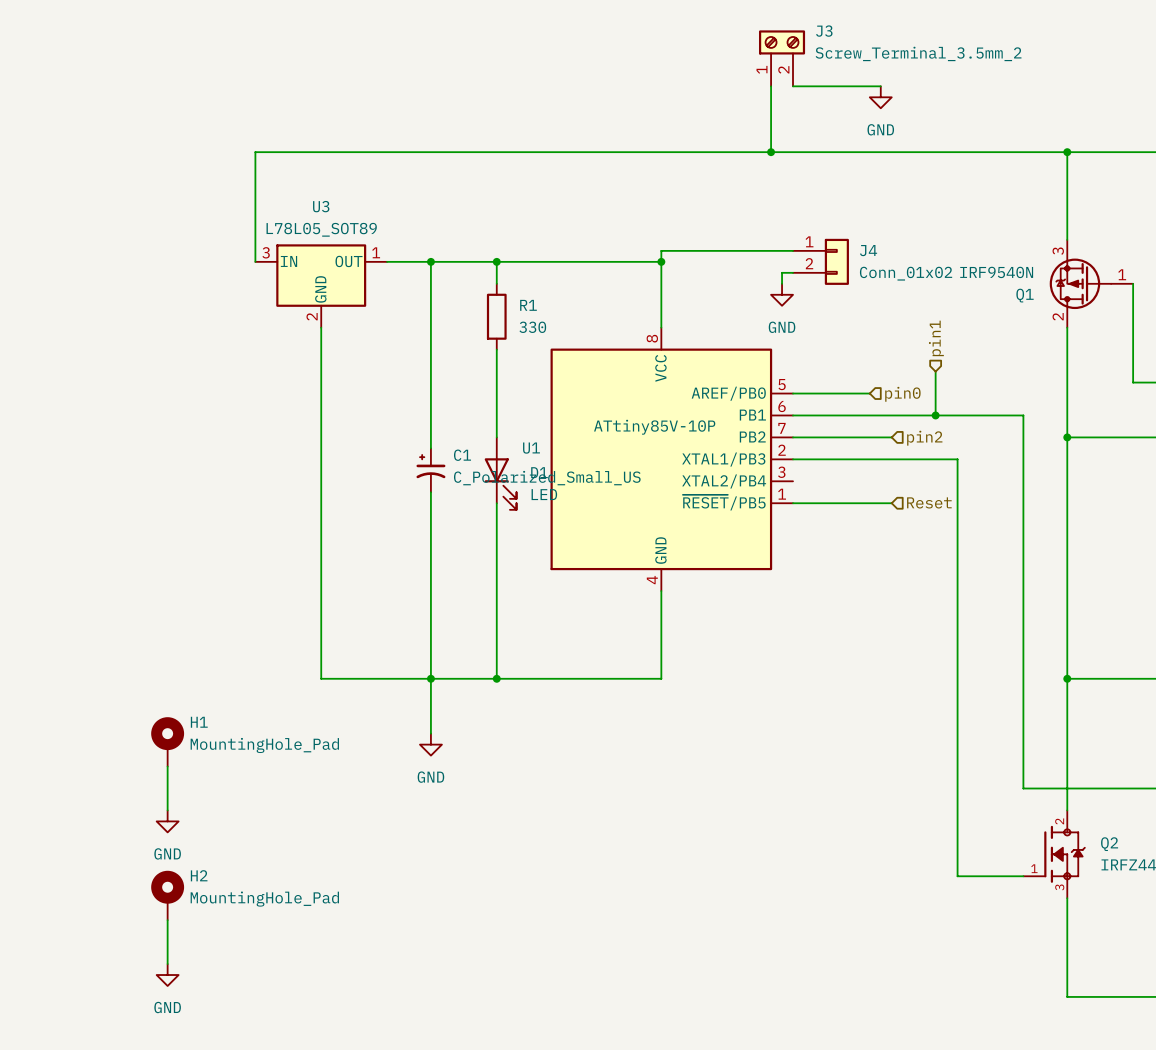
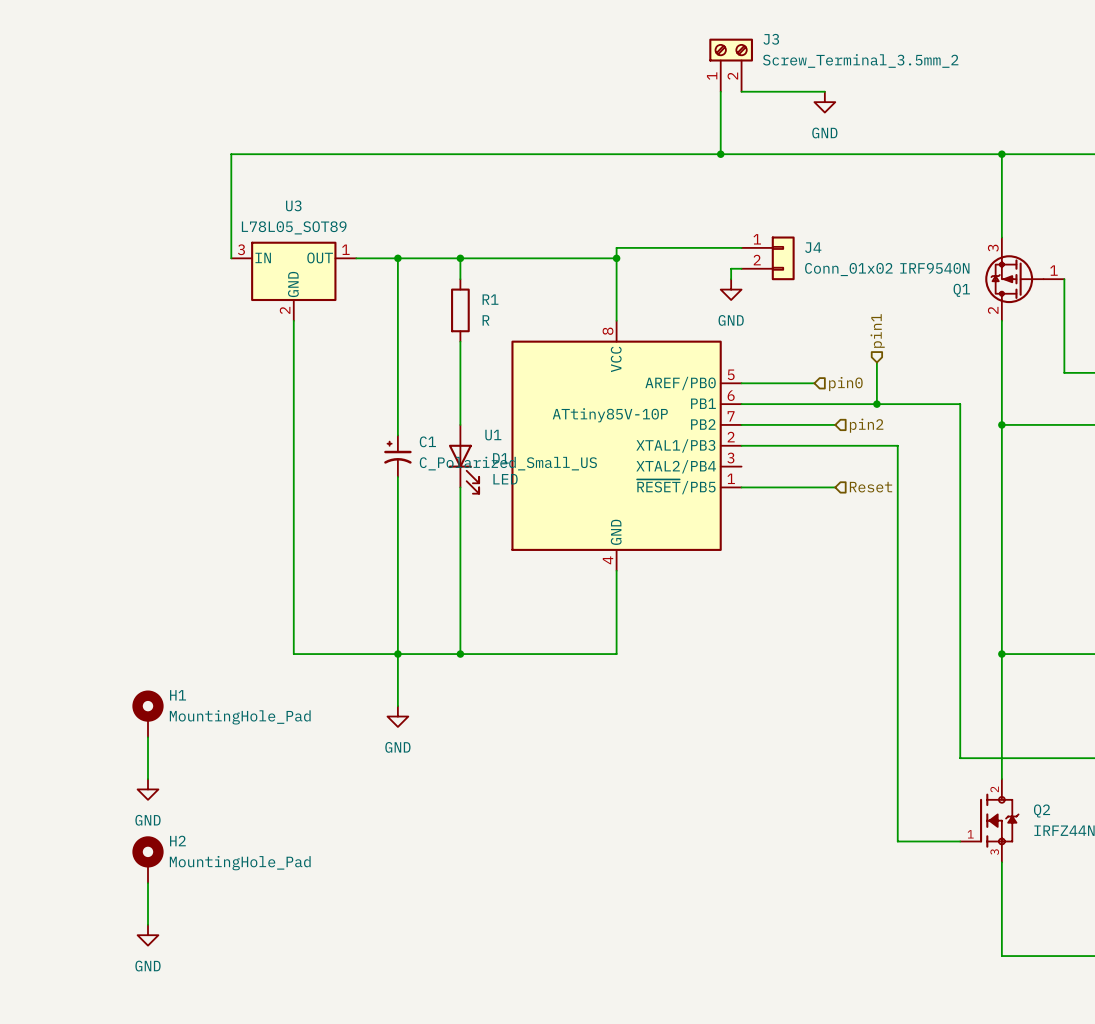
R1 value: 330 (532, 327) -> R (485, 320)

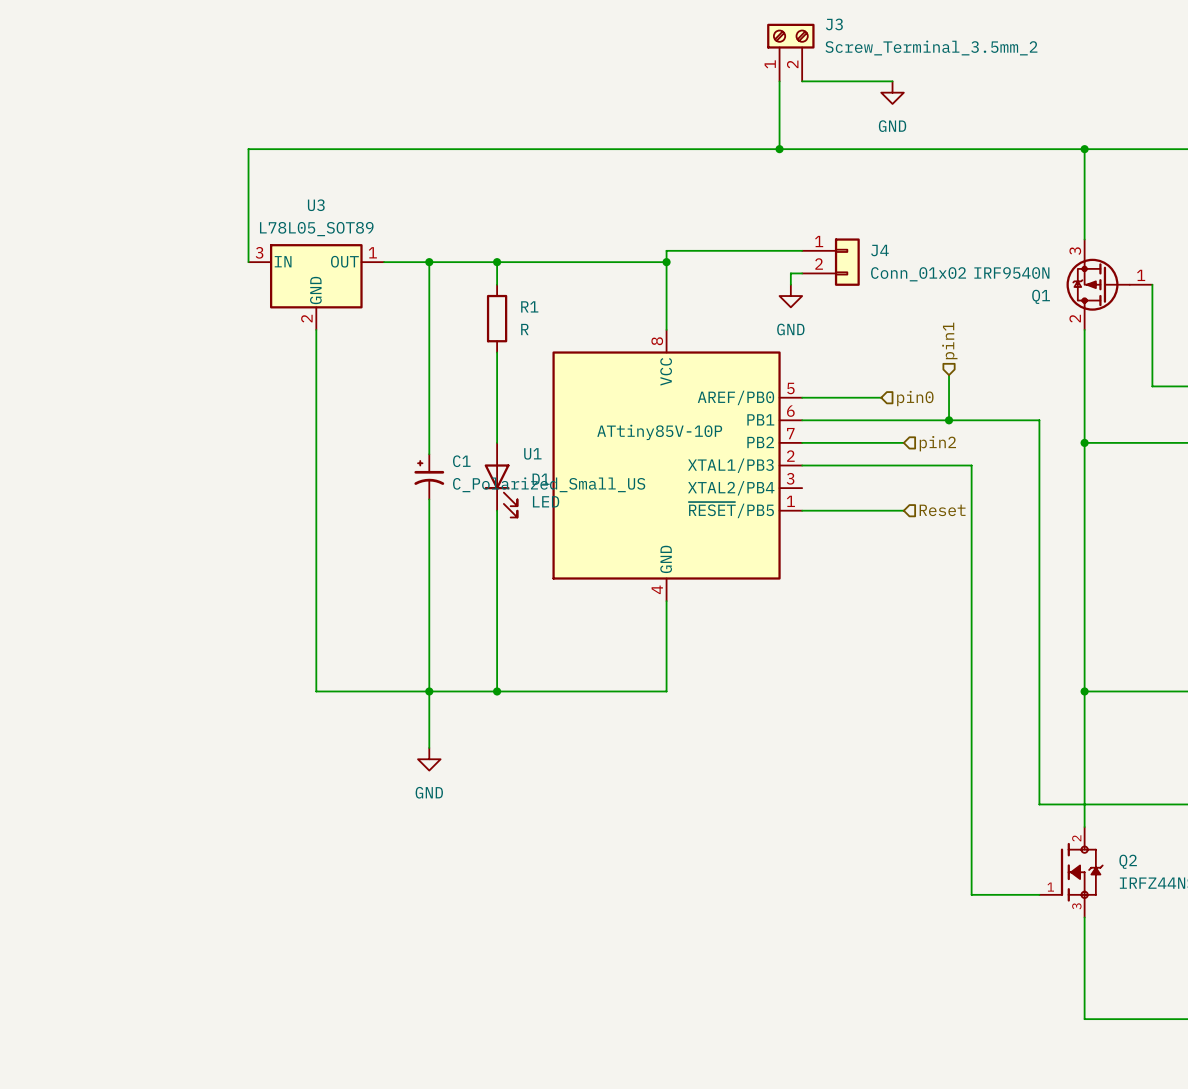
H1: MountingHole_Pad (148, 713) -> none
wire: (148, 737) (148, 779) -> none
power symbol: GND (148, 789) -> none
H2: MountingHole_Pad (148, 859) -> none
wire: (148, 883) (148, 924) -> none
power symbol: GND (148, 935) -> none

